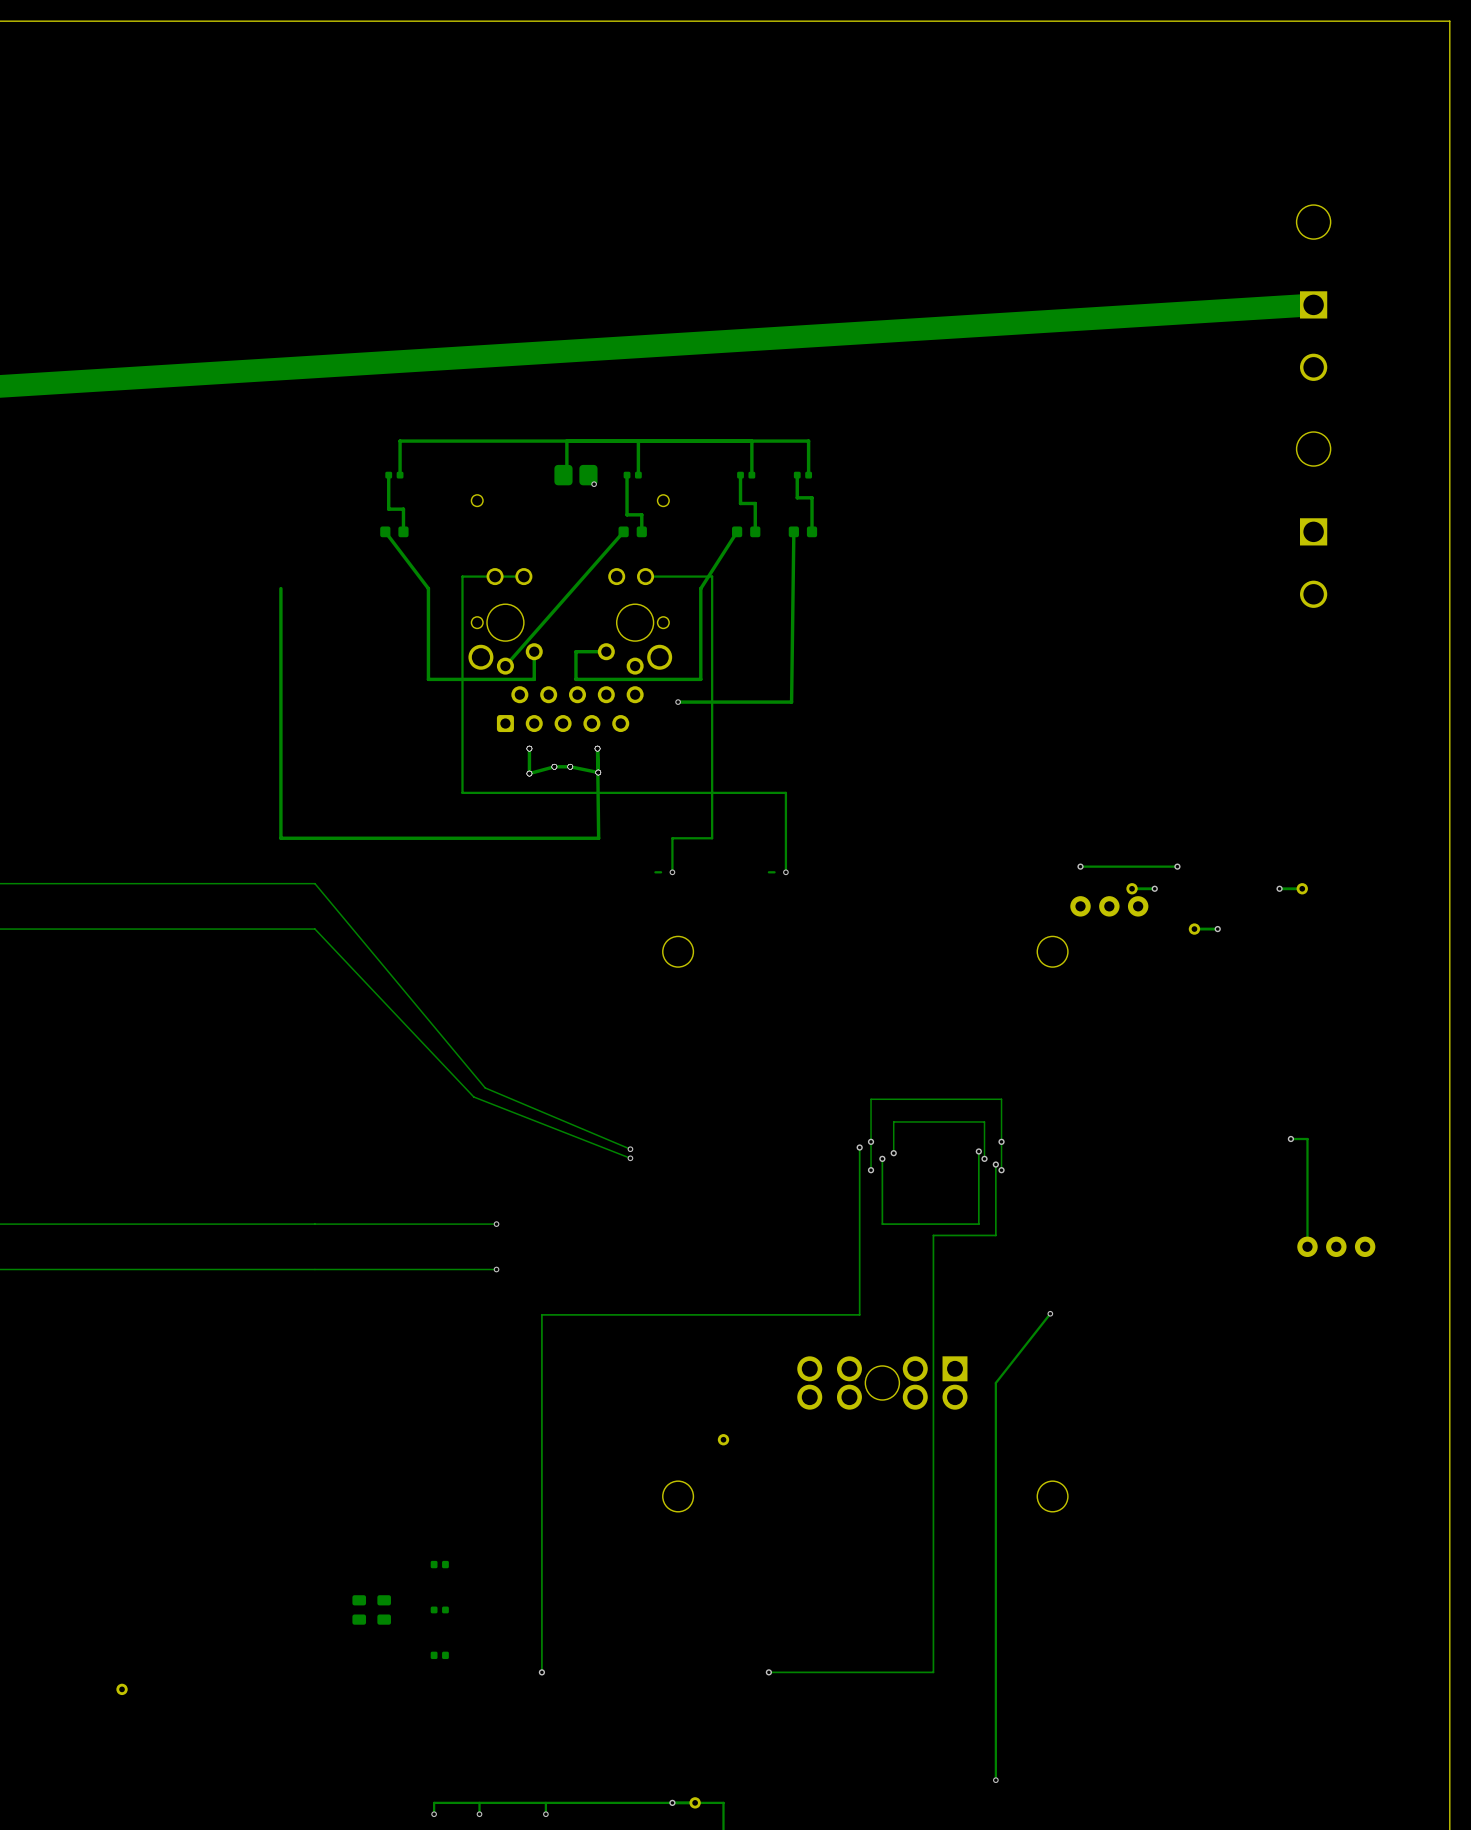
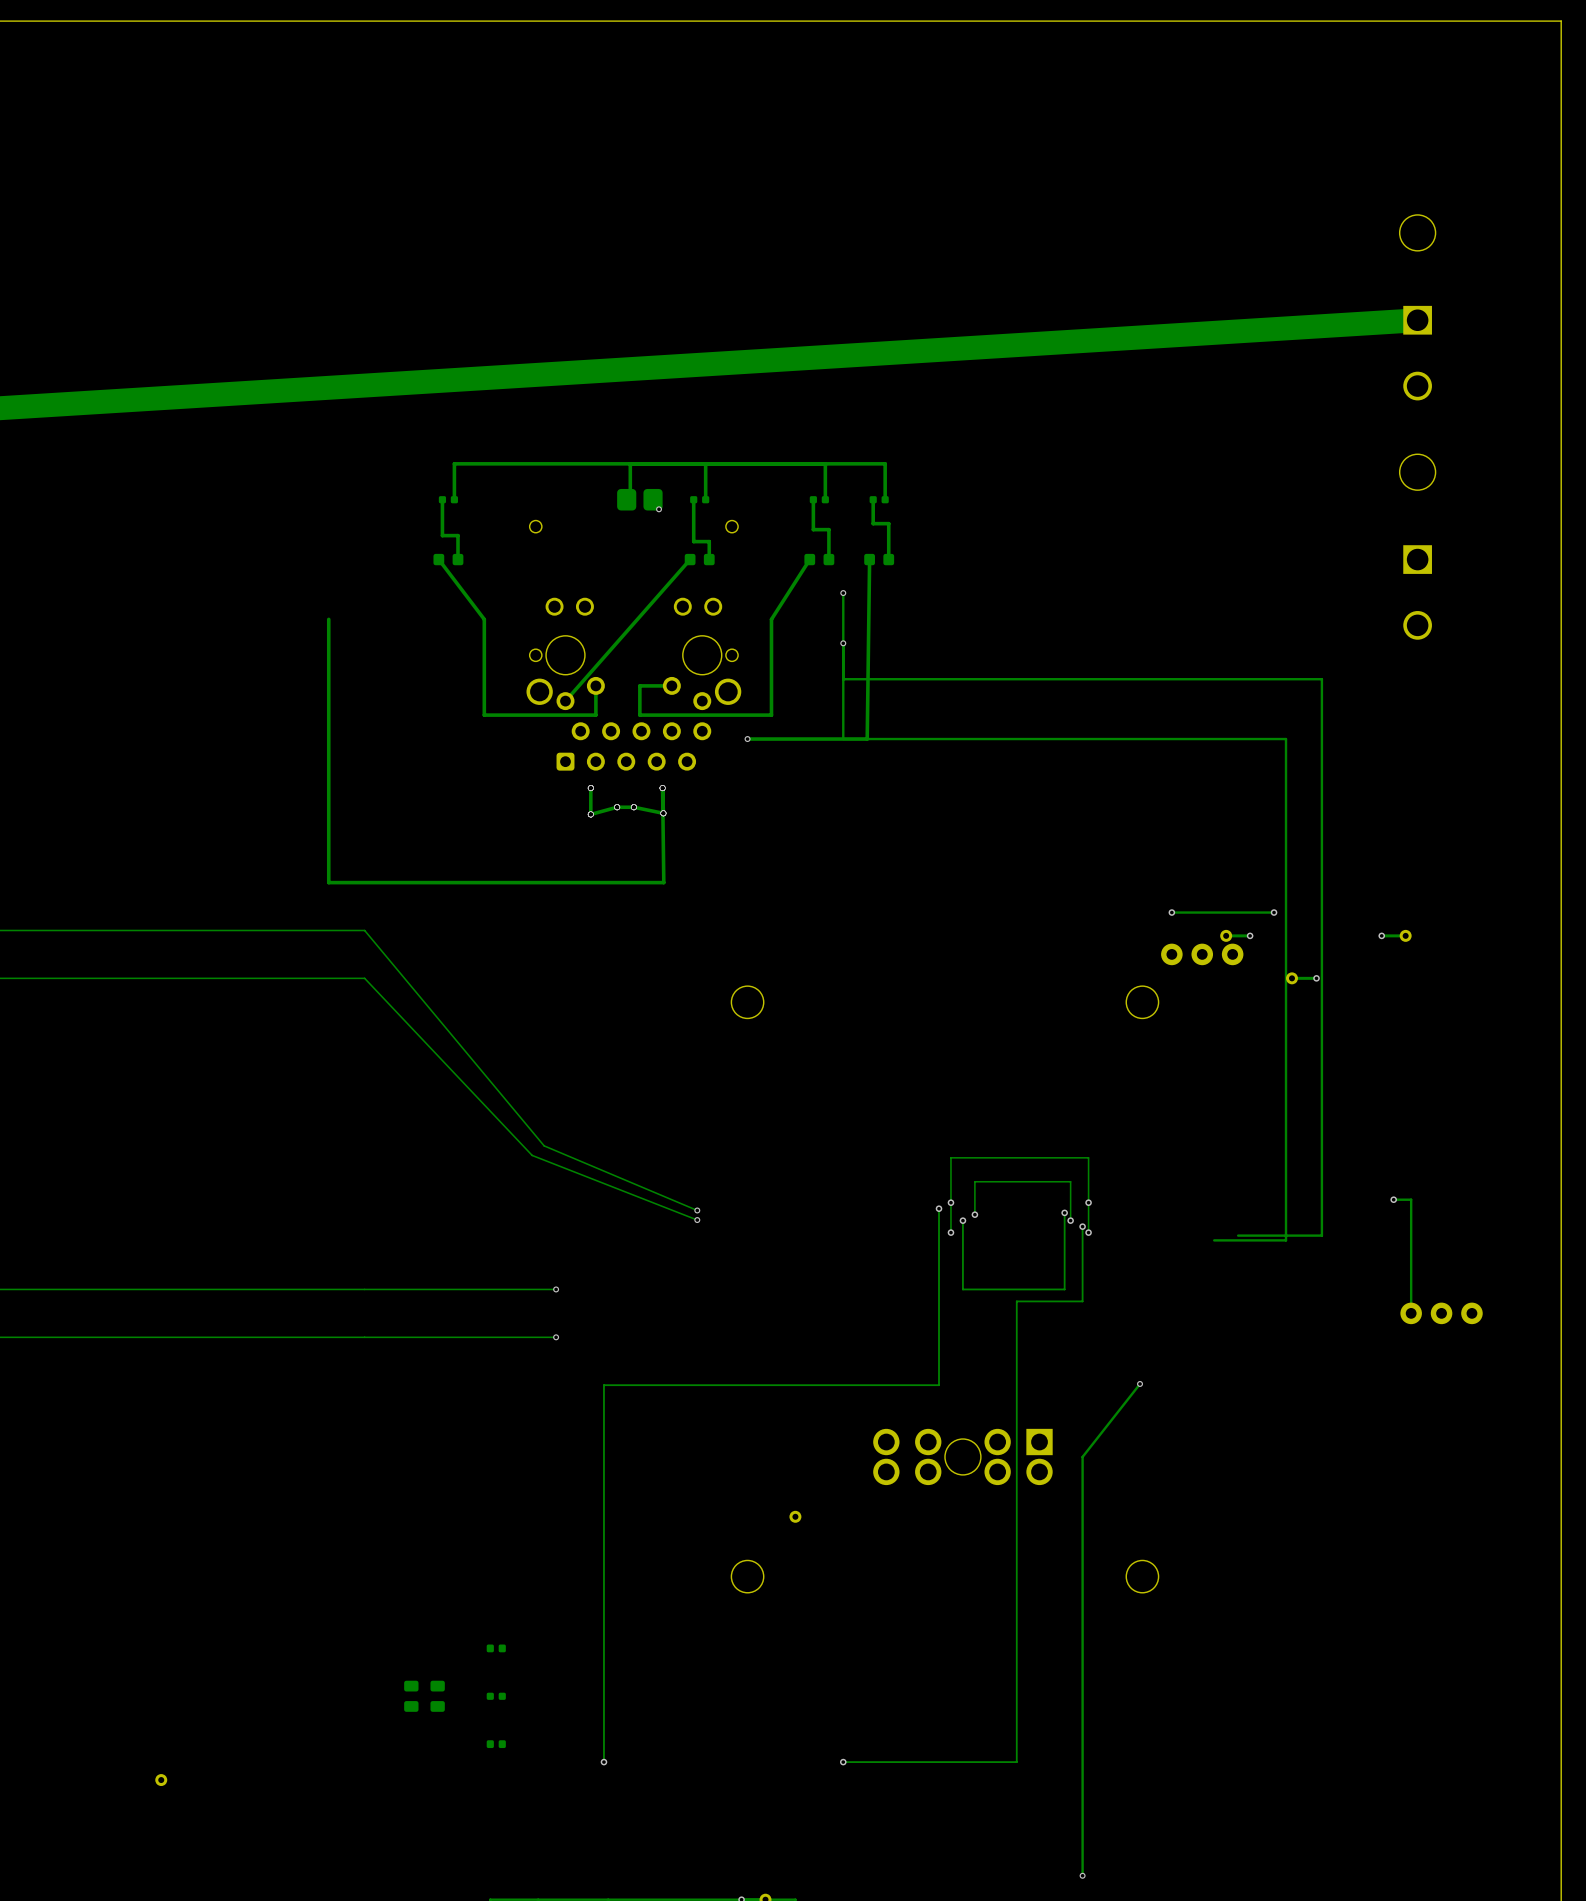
track: none -> (843, 593) (843, 739) (1286, 739) (1286, 1240) (1214, 1240)
via: none -> (843, 593)
track: (523, 576) (462, 576) (462, 792) (785, 792) (785, 872) -> none
track: (645, 576) (712, 576) (712, 838) (672, 838) (672, 872) -> none
via: none -> (843, 643)
track: none -> (843, 679) (1321, 679) (1321, 1235) (1238, 1235)
track: (661, 872) (655, 872) -> none
via: (672, 872) -> none
track: (774, 872) (768, 872) -> none
via: (785, 872) -> none

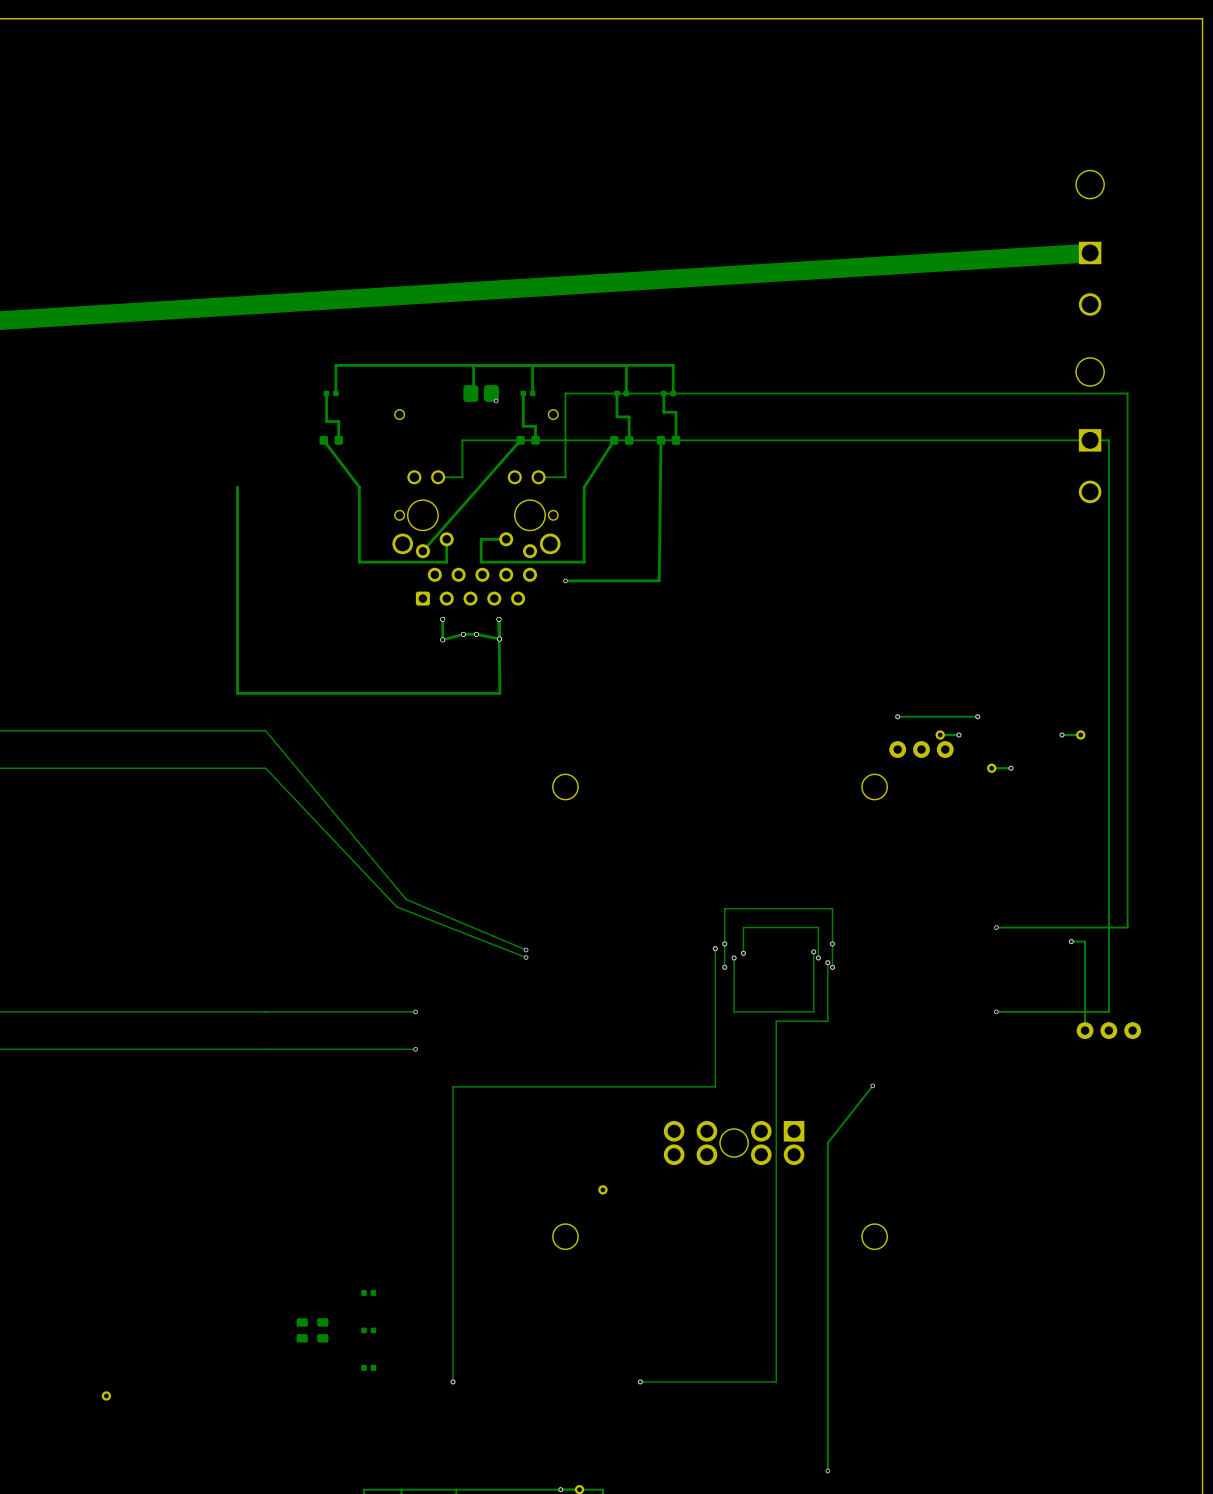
track: (843, 593) (843, 739) (1286, 739) (1286, 1240) (1214, 1240) -> none
via: (843, 593) -> none
track: none -> (438, 477) (462, 477) (462, 440) (1108, 440) (1108, 1011) (996, 1011)
track: none -> (538, 477) (565, 477) (565, 393) (1127, 393) (1127, 927) (996, 927)
via: (843, 643) -> none
track: (843, 679) (1321, 679) (1321, 1235) (1238, 1235) -> none
via: none -> (996, 927)
via: none -> (996, 1011)

